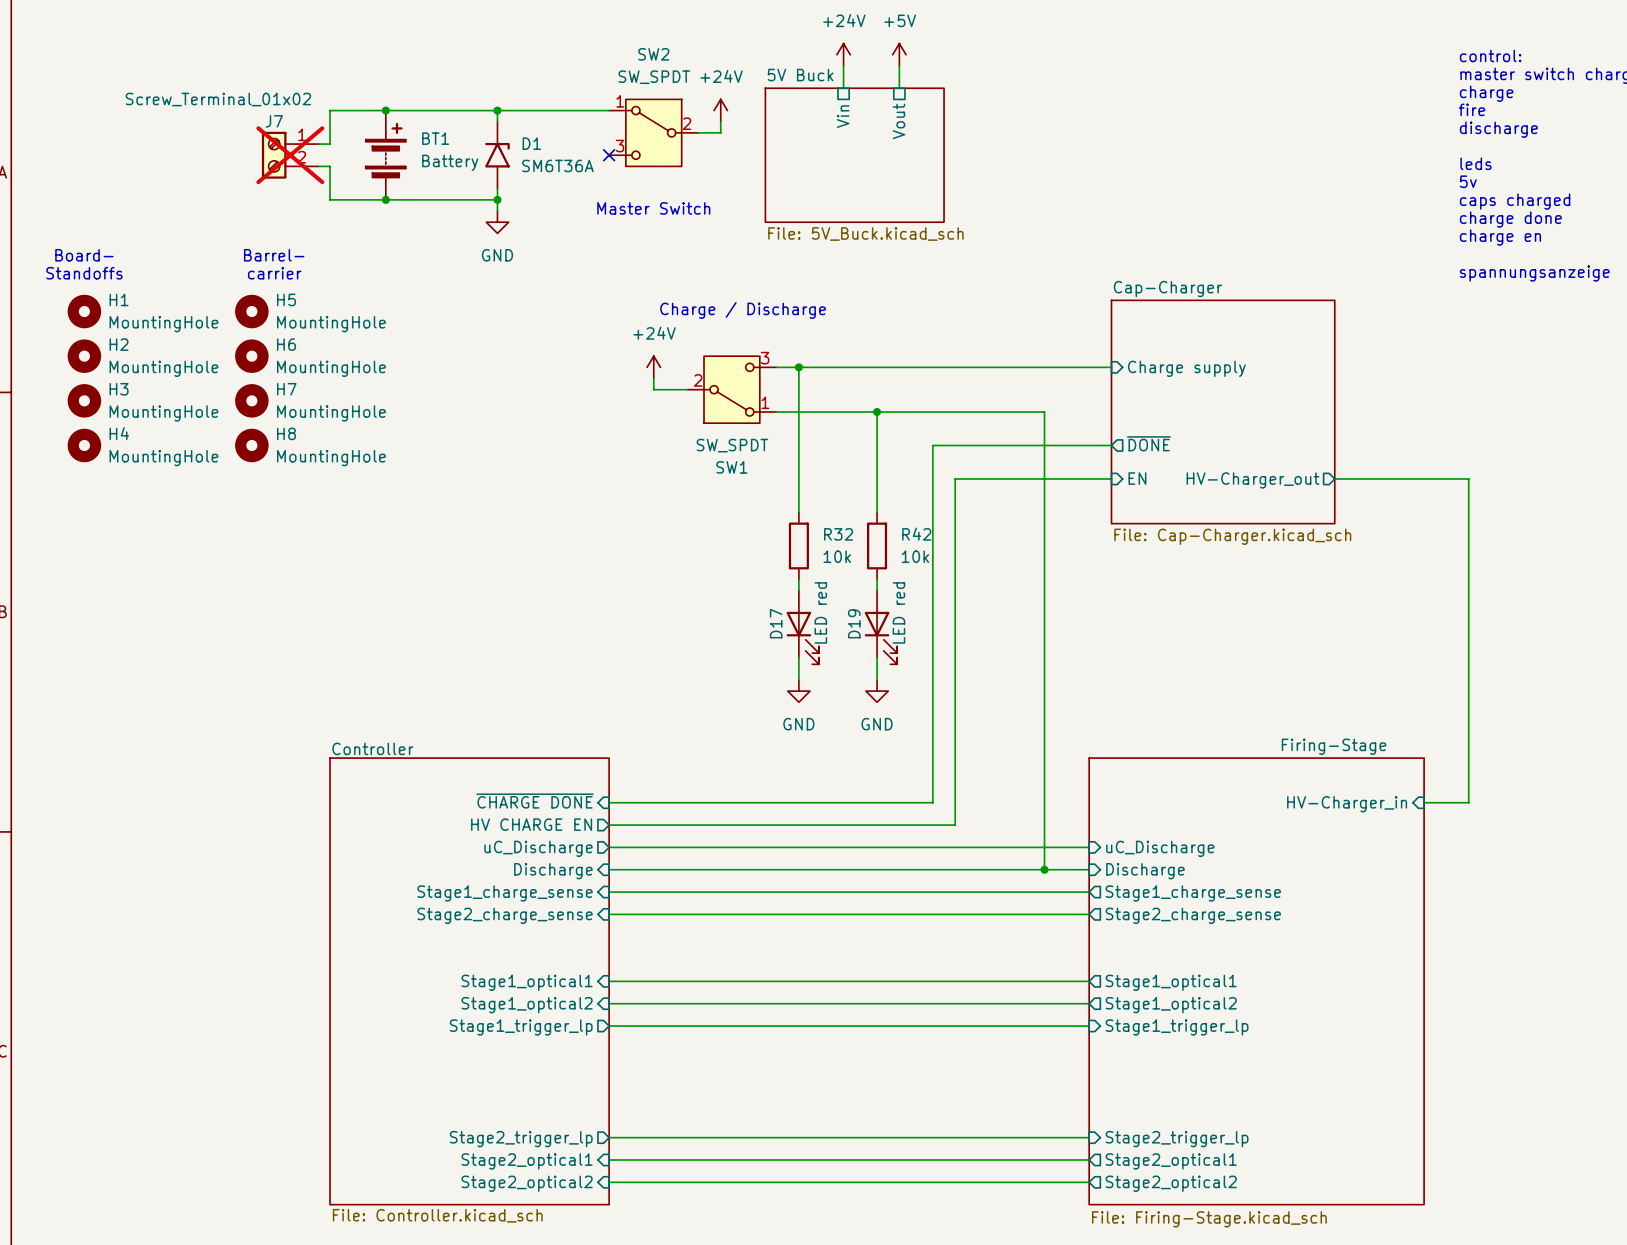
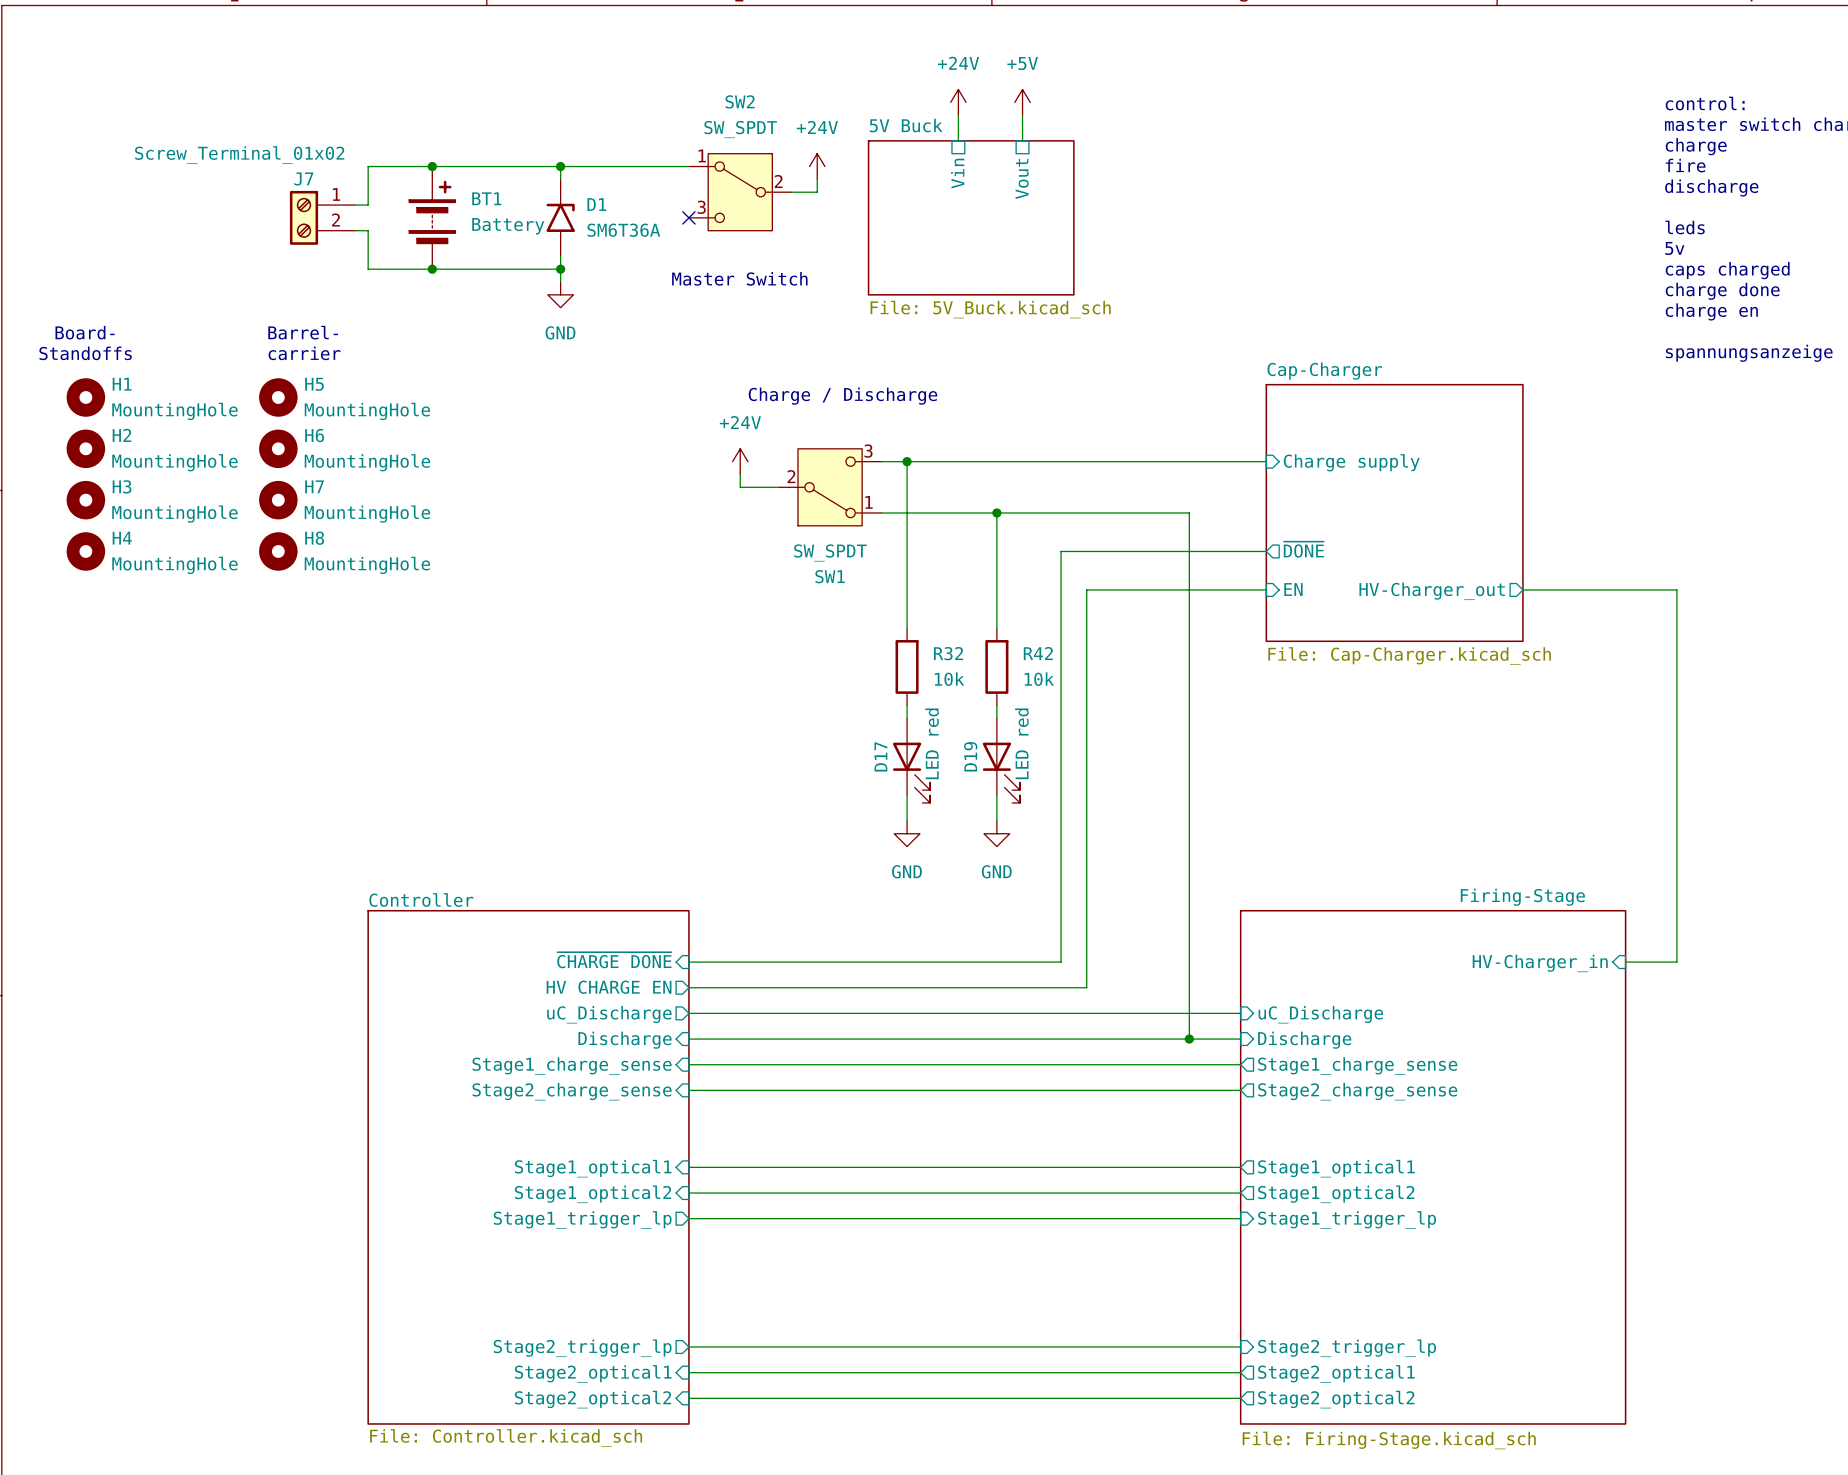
J7 do-not-place cross: (290, 155) -> none

